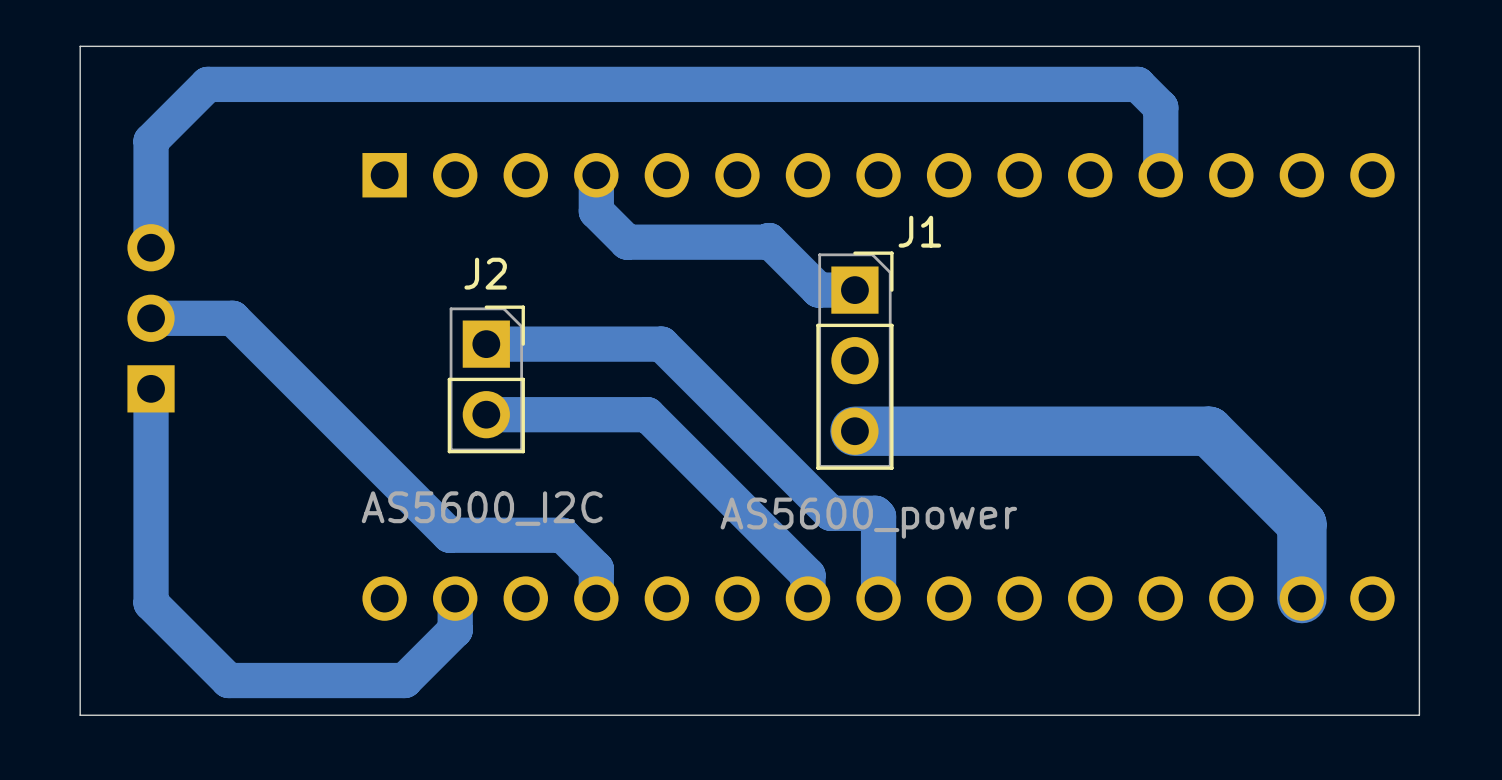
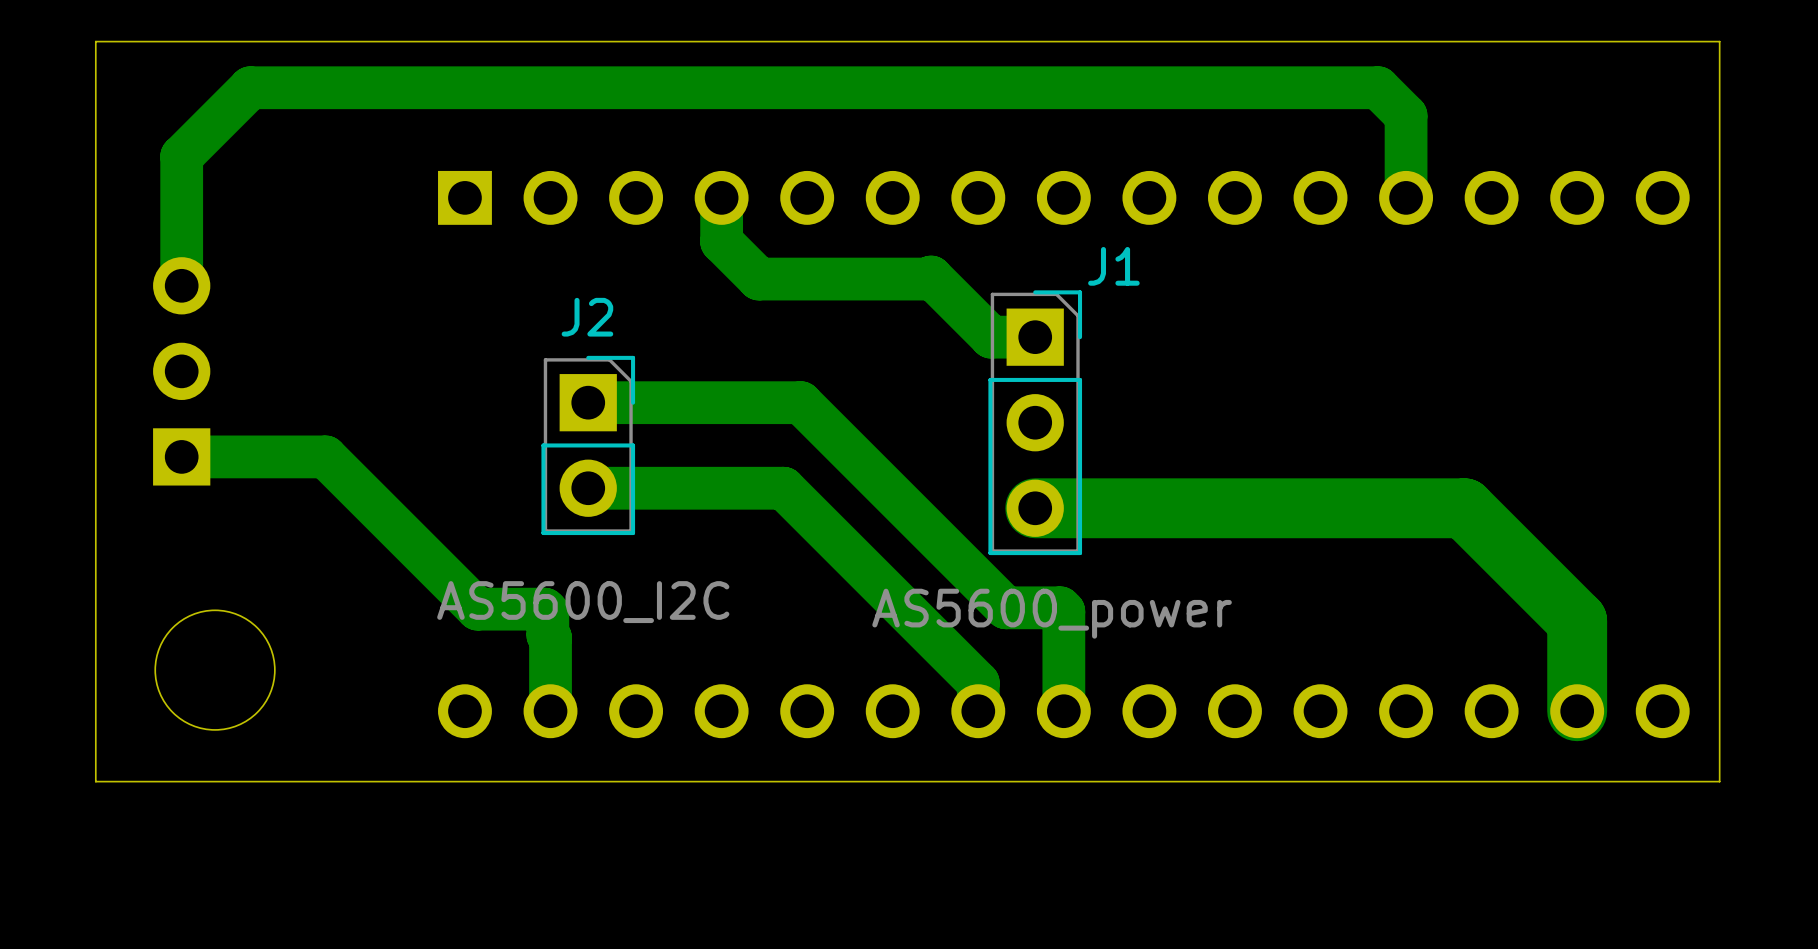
bottom track: (151, 318) (232, 318) (449, 535) (562, 535) (596, 568) (596, 598) -> none
bottom track: (151, 388) (151, 603) (228, 680) (404, 680) (455, 630) (455, 598) -> (181, 456) (325, 456) (477, 609) (544, 609) (547, 612) (547, 635) (550, 637) (550, 711)
round board edge: none -> [154, 609, 276, 731]
board edge: (1419, 656) (1419, 715) (80, 715) (80, 656) -> (1719, 781) (95, 781)

